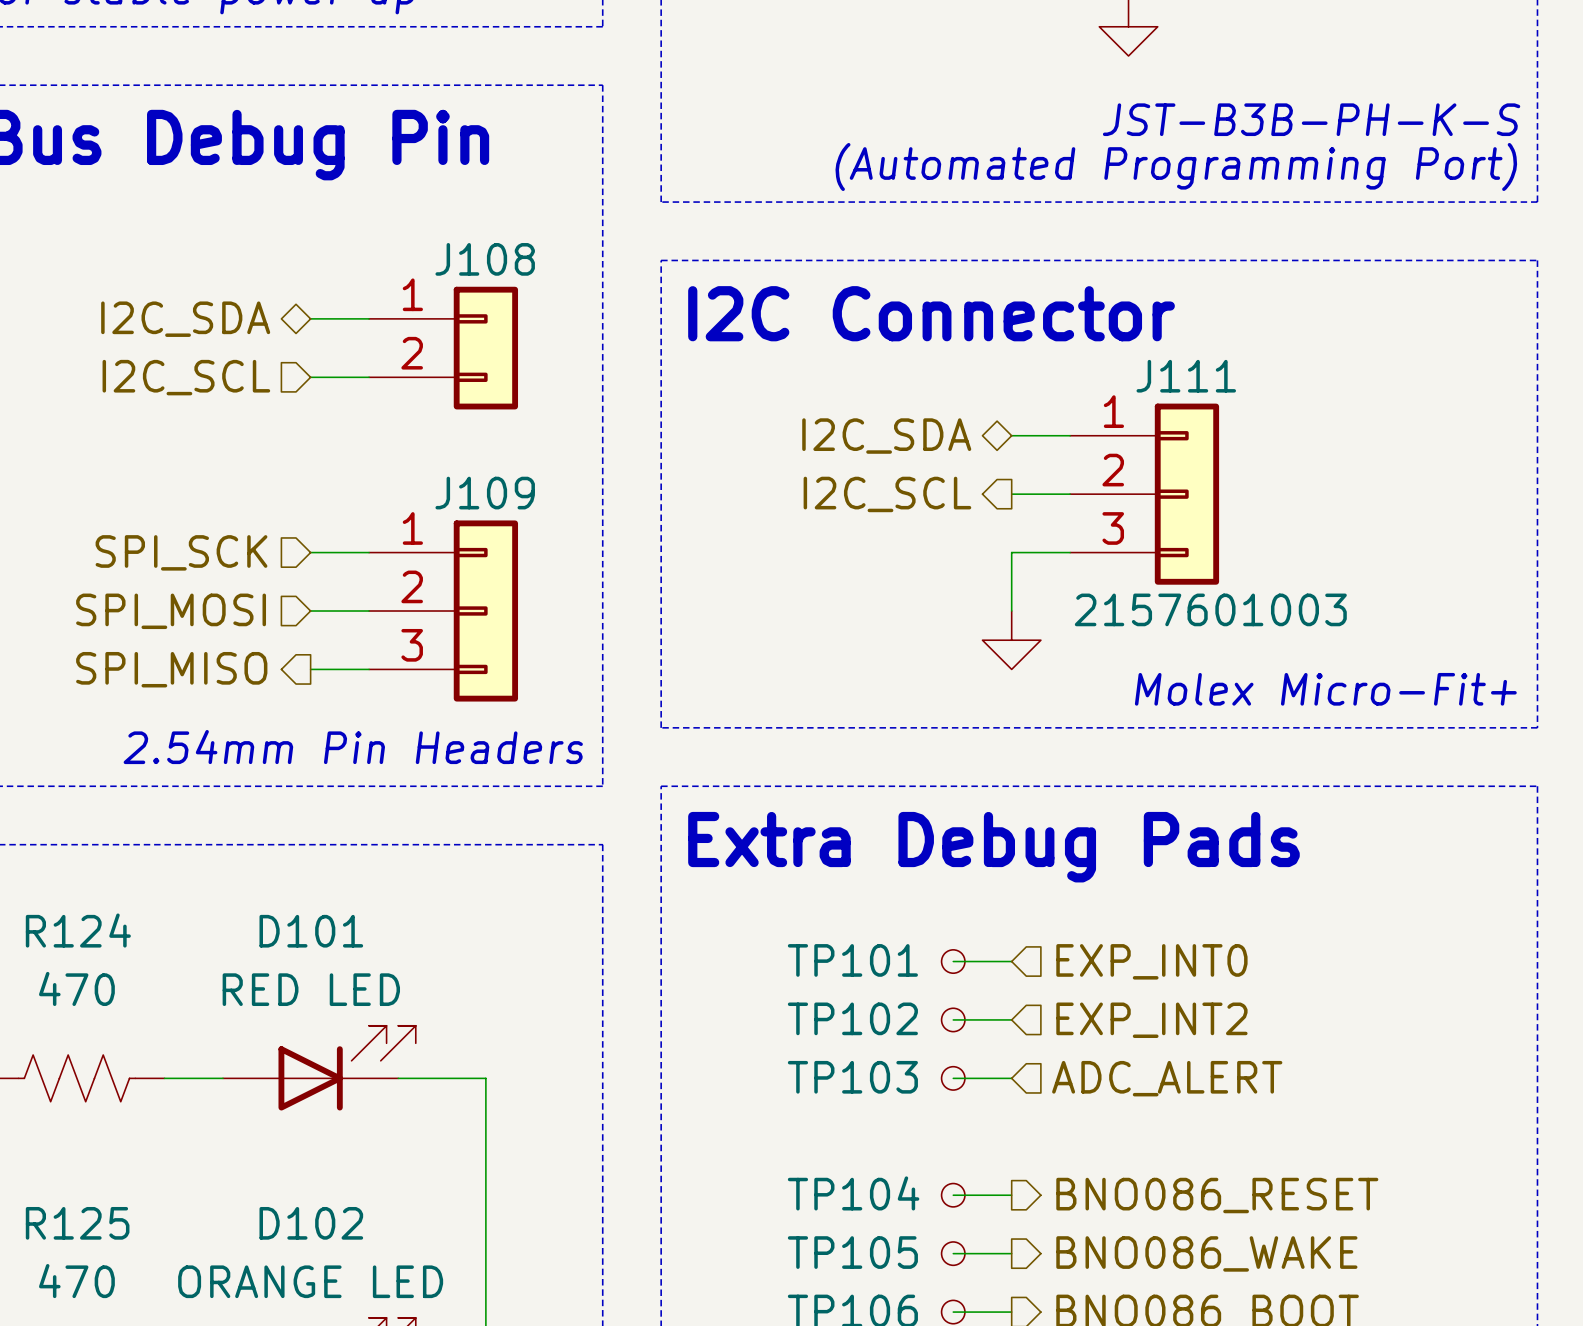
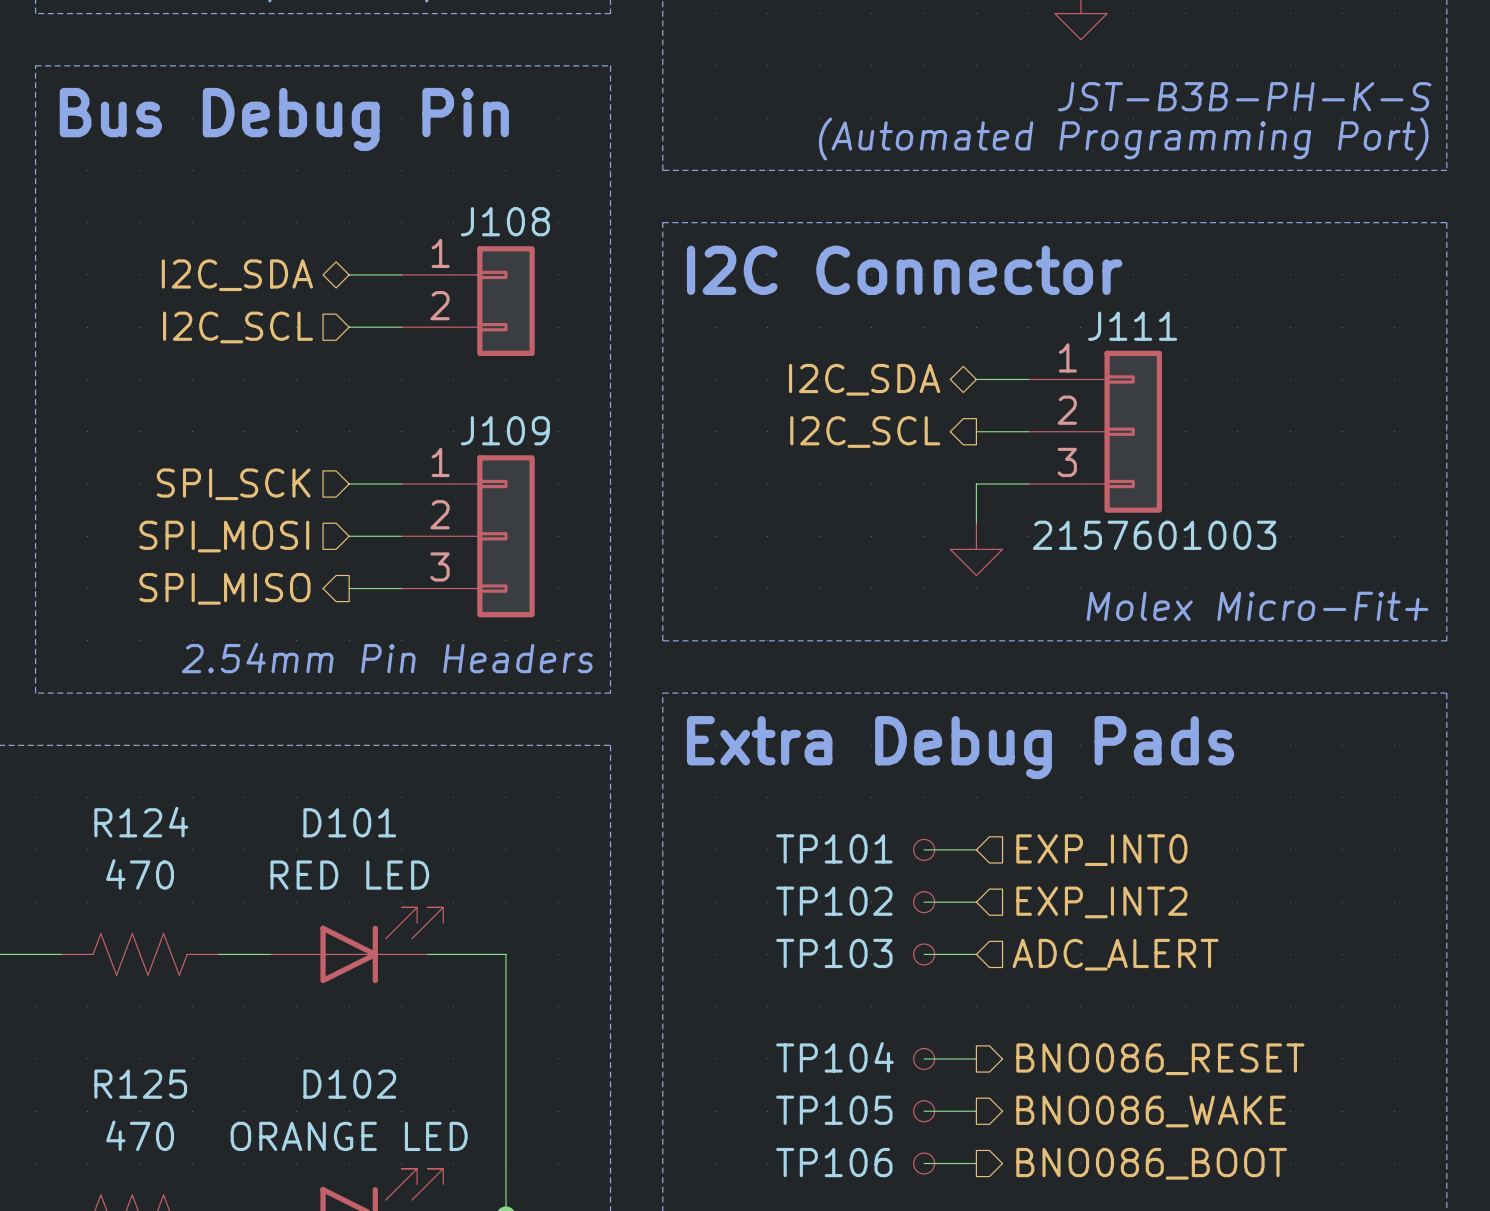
power symbol position: (1011, 640) -> (976, 549)

